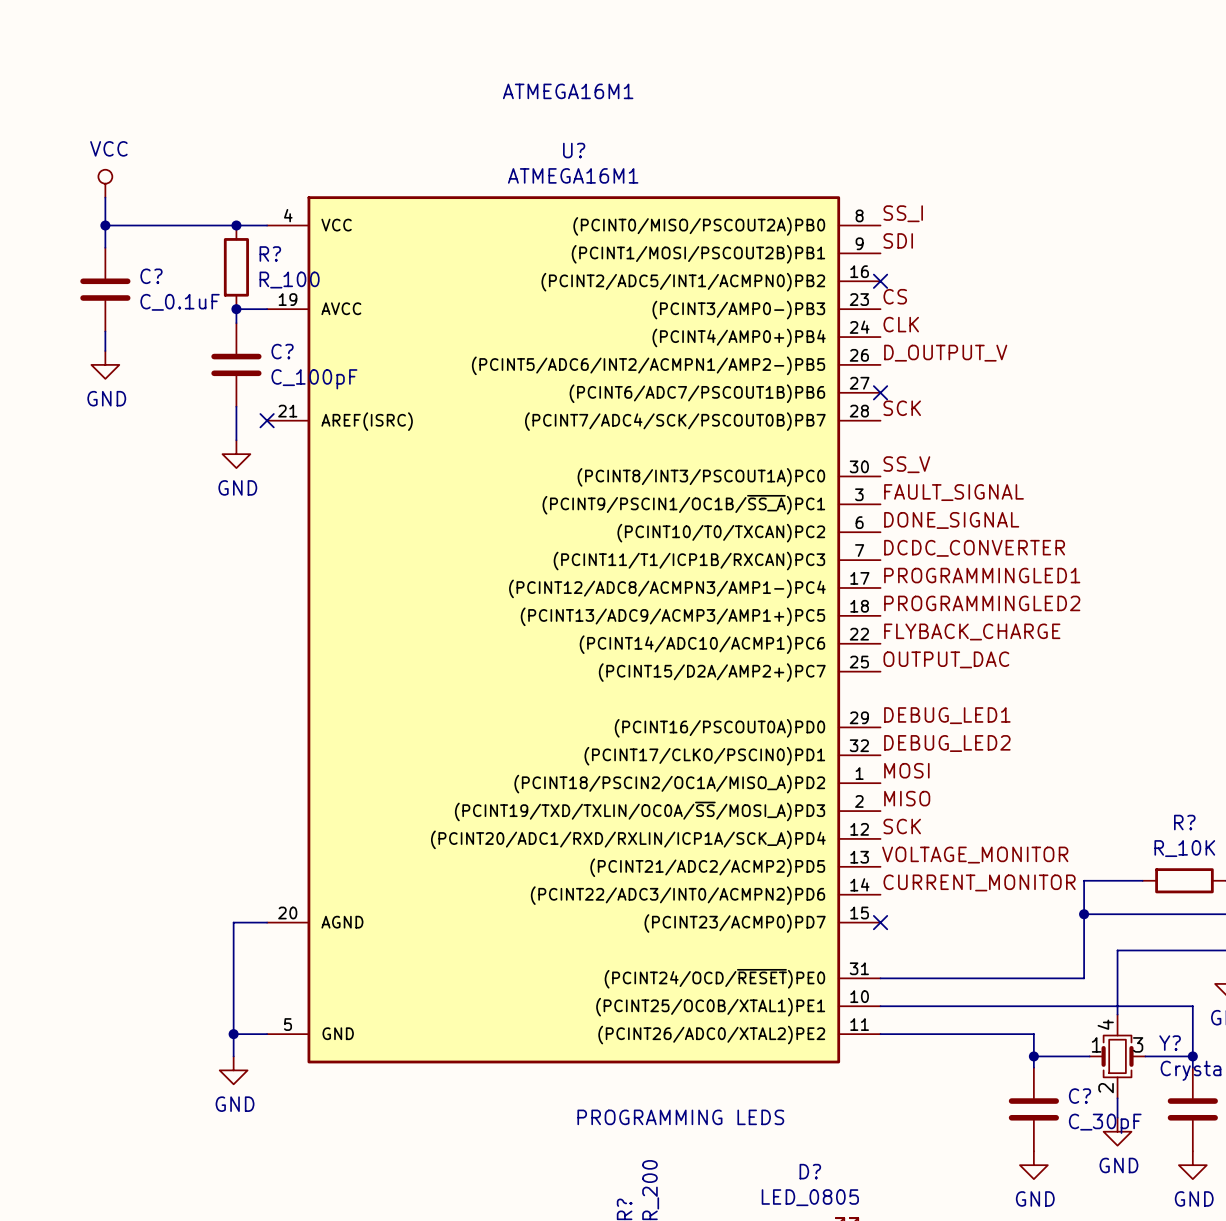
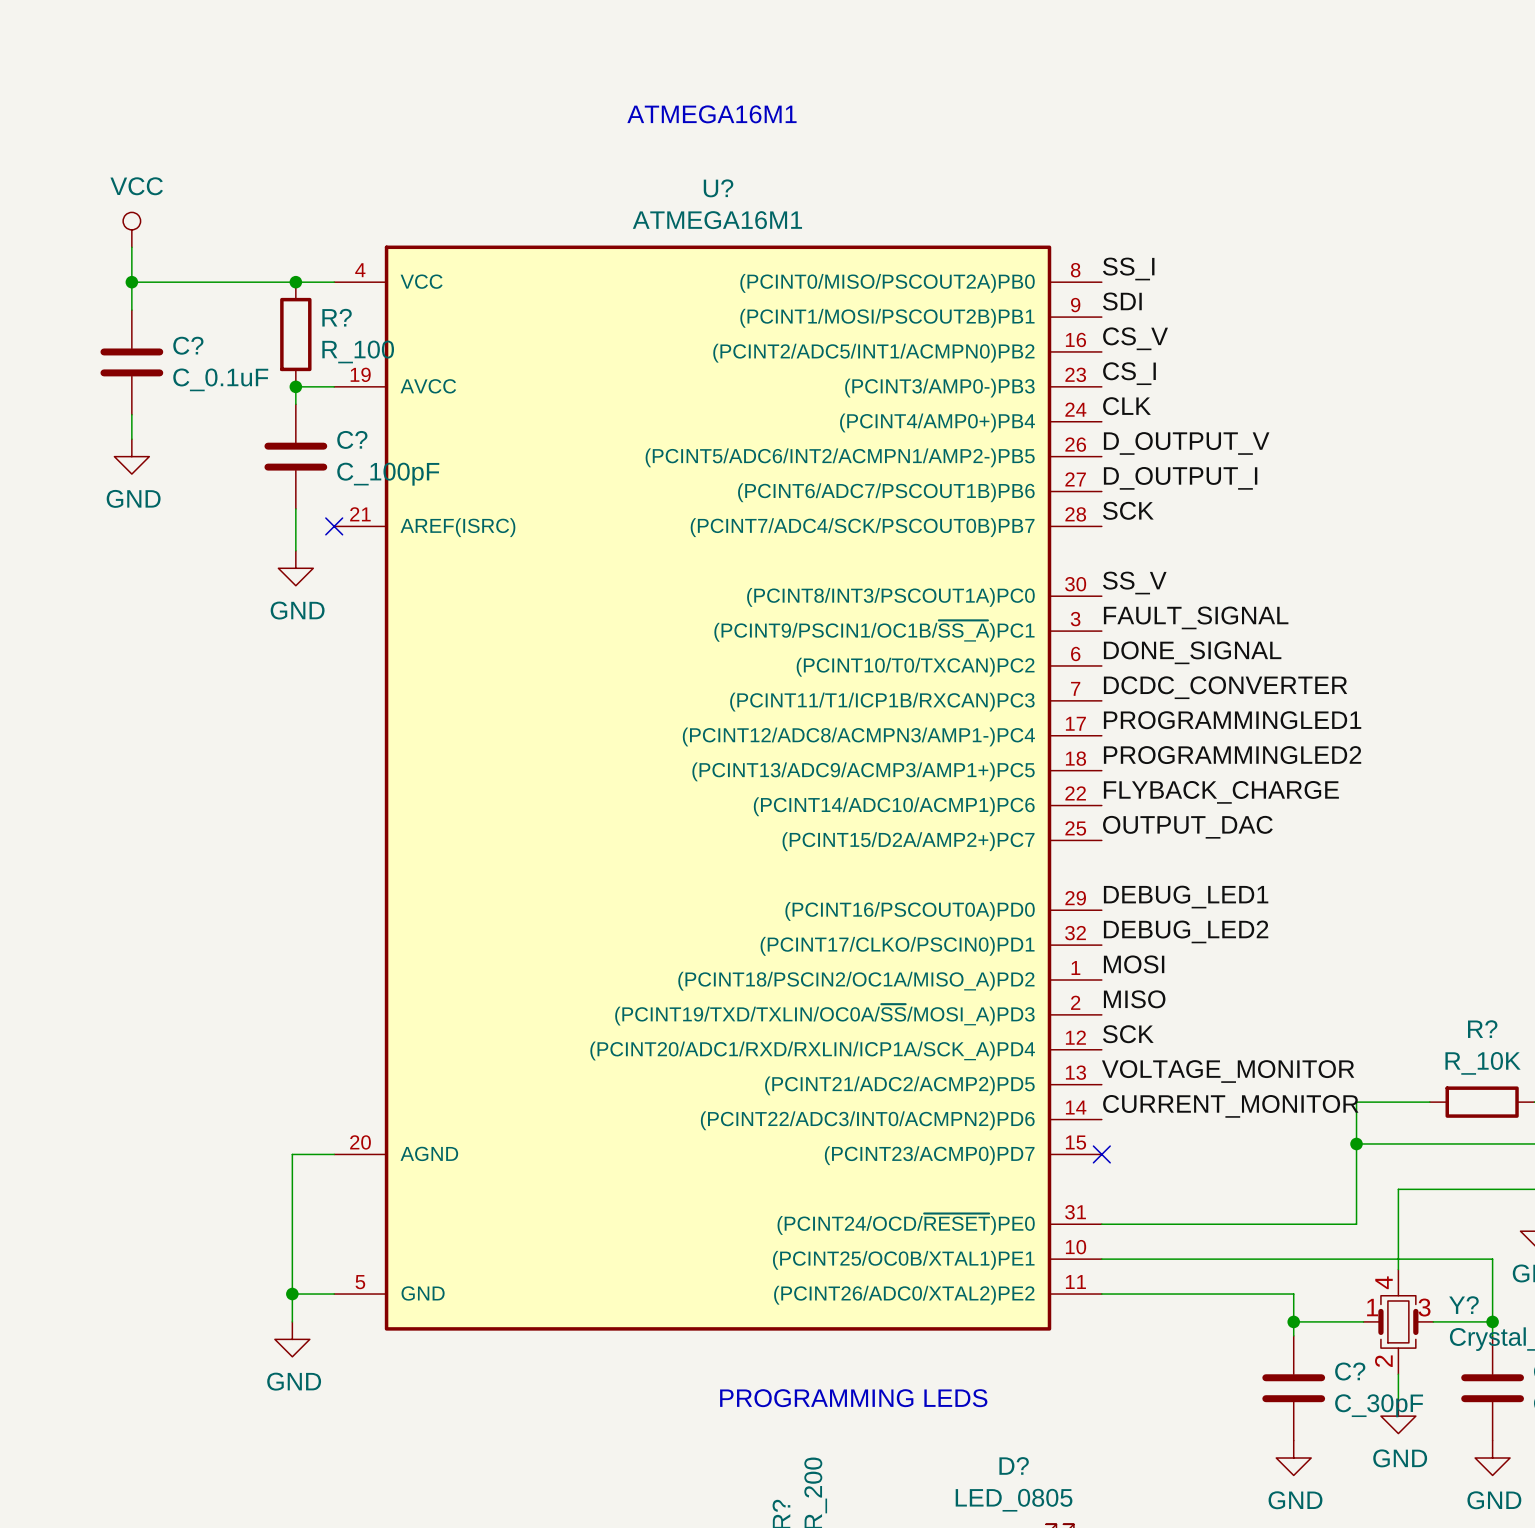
label: none -> CS_V (1135, 338)
no-connect mark: (880, 281) -> none
label: CS (895, 296) -> CS_I (1129, 373)
label: none -> D_OUTPUT_I (1180, 478)
no-connect mark: (880, 392) -> none

